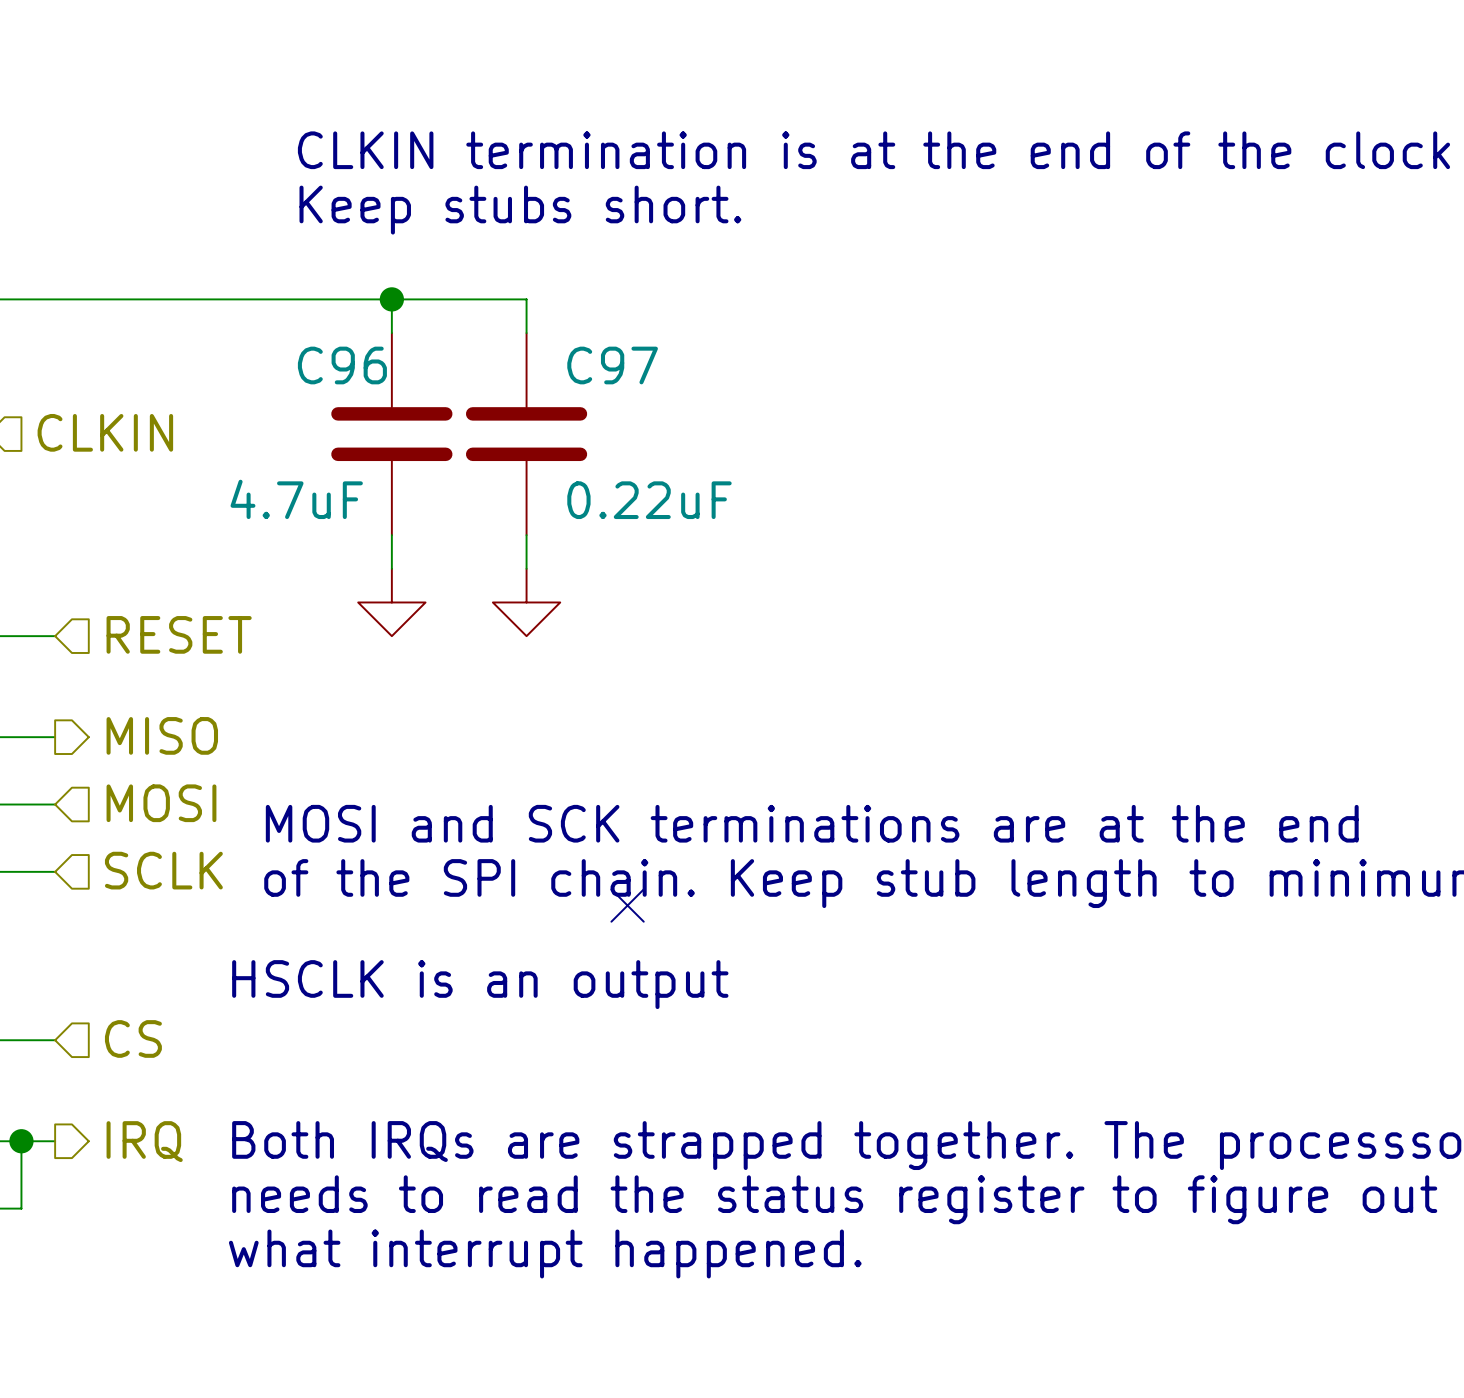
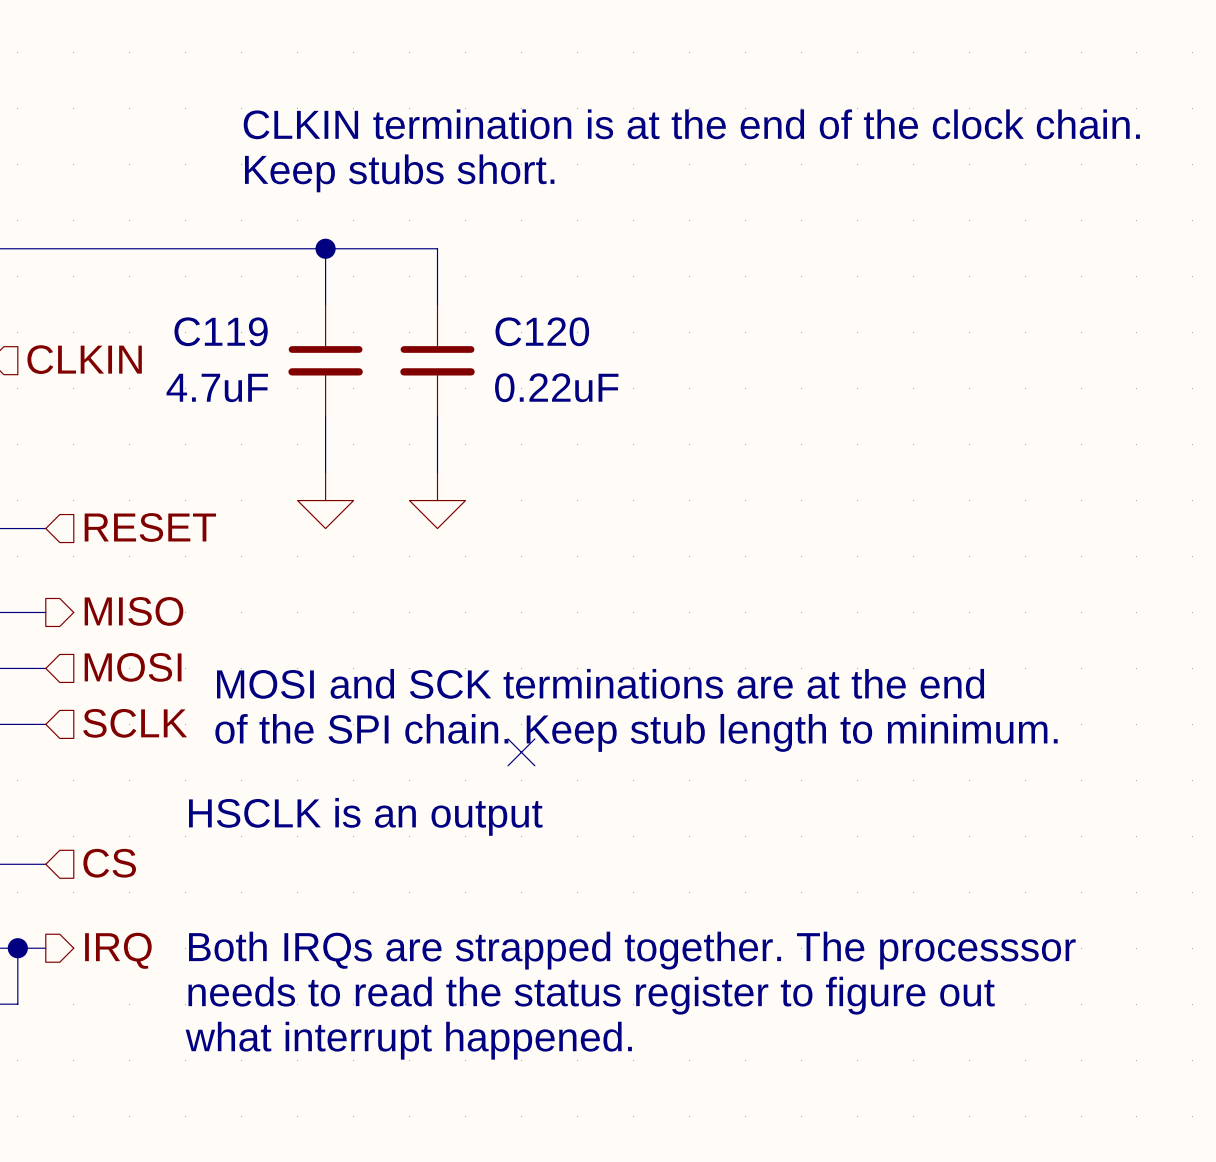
C96: 4.7uF (391, 434) -> none
C119: none -> 4.7uF (325, 360)
C97: 0.22uF (526, 434) -> none
C120: none -> 0.22uF (437, 360)

